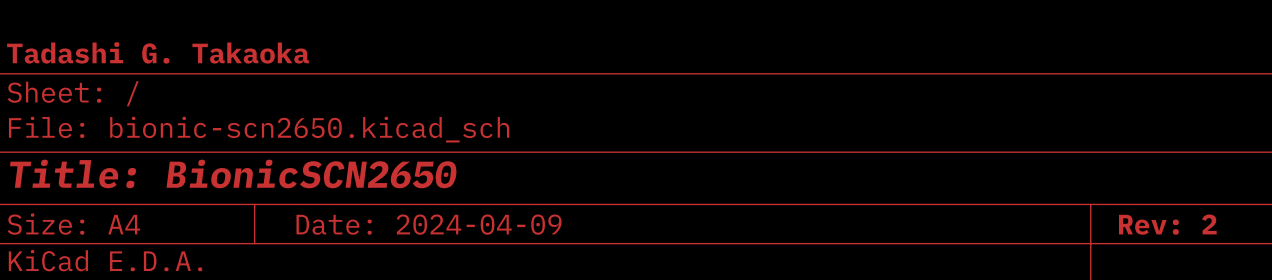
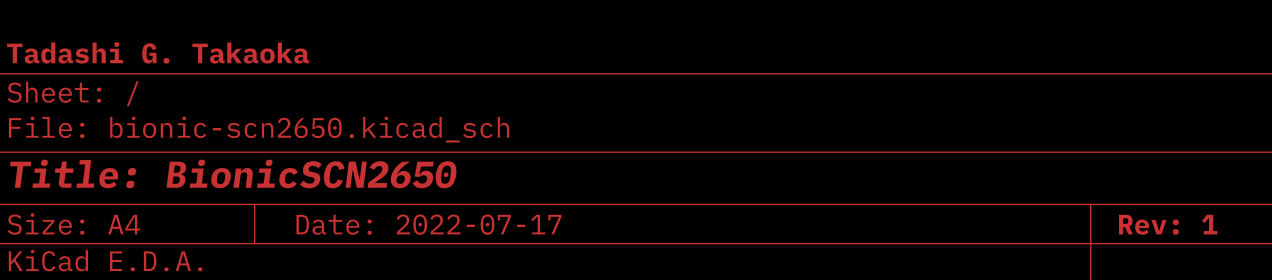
title block: Date: 2024-04-09 (429, 224) -> Date: 2022-07-17 (428, 224)
title block: Rev: 2 (1167, 224) -> Rev: 1 (1168, 224)

